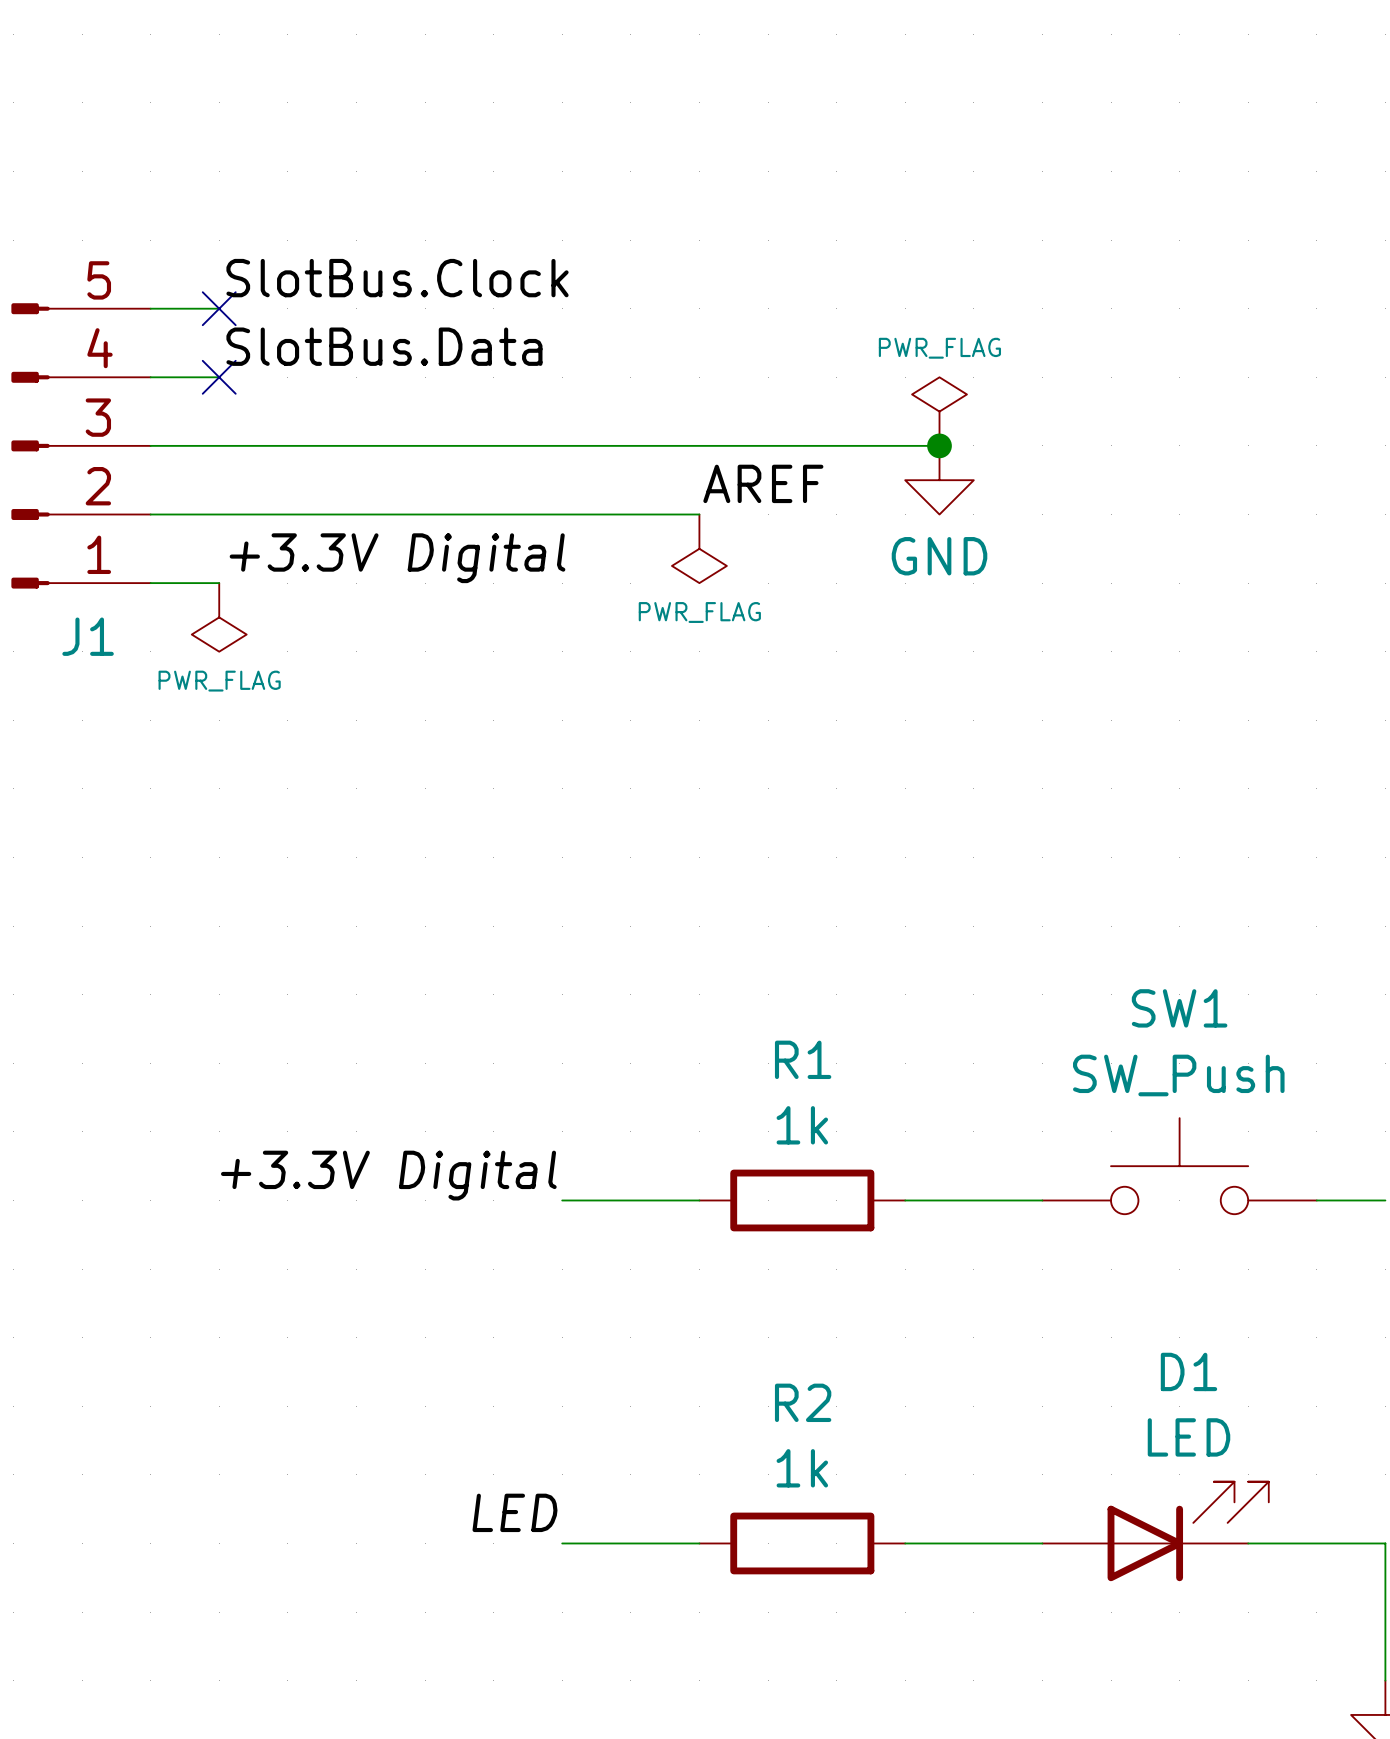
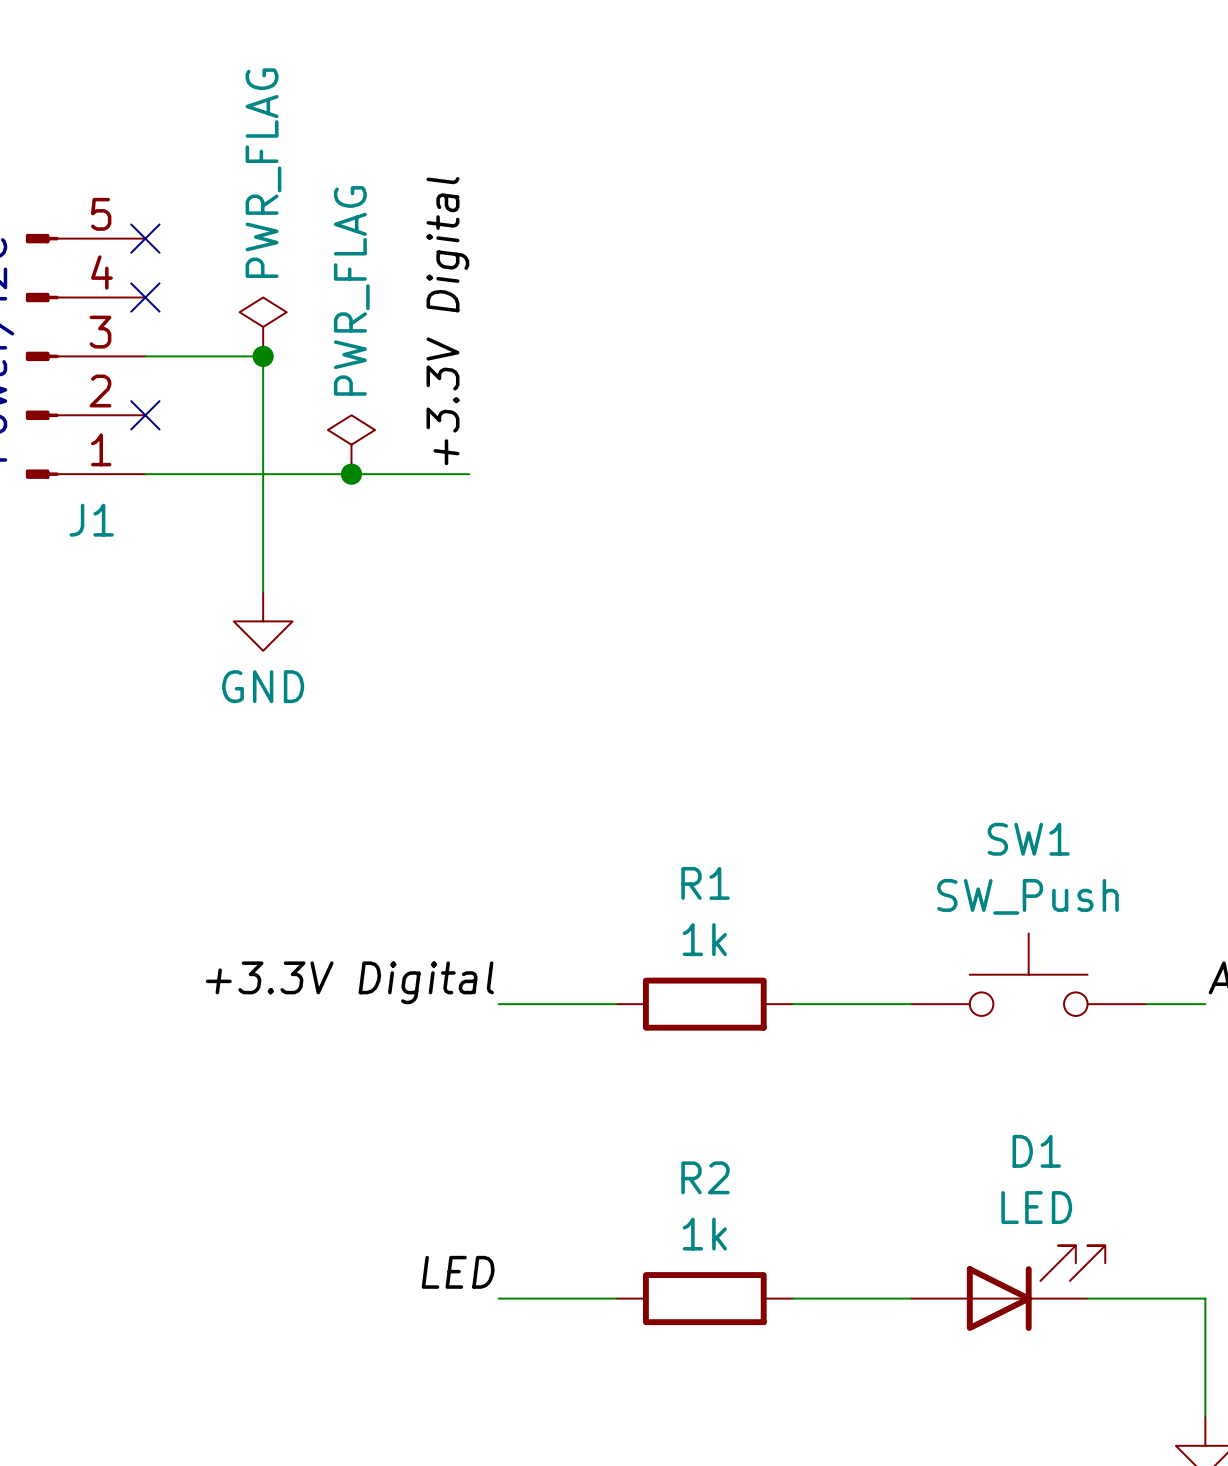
label: SlotBus.Clock (397, 278) -> none
wire: (150, 308) (219, 308) -> none
no-connect mark: none -> (145, 238)
no-connect mark: (219, 308) -> none
label: SlotBus.Data (384, 346) -> none
wire: (150, 377) (219, 377) -> none
no-connect mark: none -> (145, 297)
no-connect mark: (219, 377) -> none
power symbol: none -> PWR_FLAG (263, 326)
power symbol: PWR_FLAG (939, 411) -> none
wire: (287, 445) (939, 445) -> (263, 356) (263, 591)
junction: none -> (263, 356)
junction: (939, 445) -> none
power symbol: GND (939, 480) -> none
label: AREF (763, 483) -> none
wire: (150, 514) (699, 514) -> none
no-connect mark: none -> (145, 415)
power symbol: none -> PWR_FLAG (351, 444)
power symbol: PWR_FLAG (699, 548) -> none
label rotation: 0° (397, 558) -> 90° counterclockwise (447, 321)
wire: none -> (204, 474) (469, 474)
junction: none -> (351, 474)
power symbol: PWR_FLAG (219, 617) -> none
power symbol: none -> GND (263, 621)

